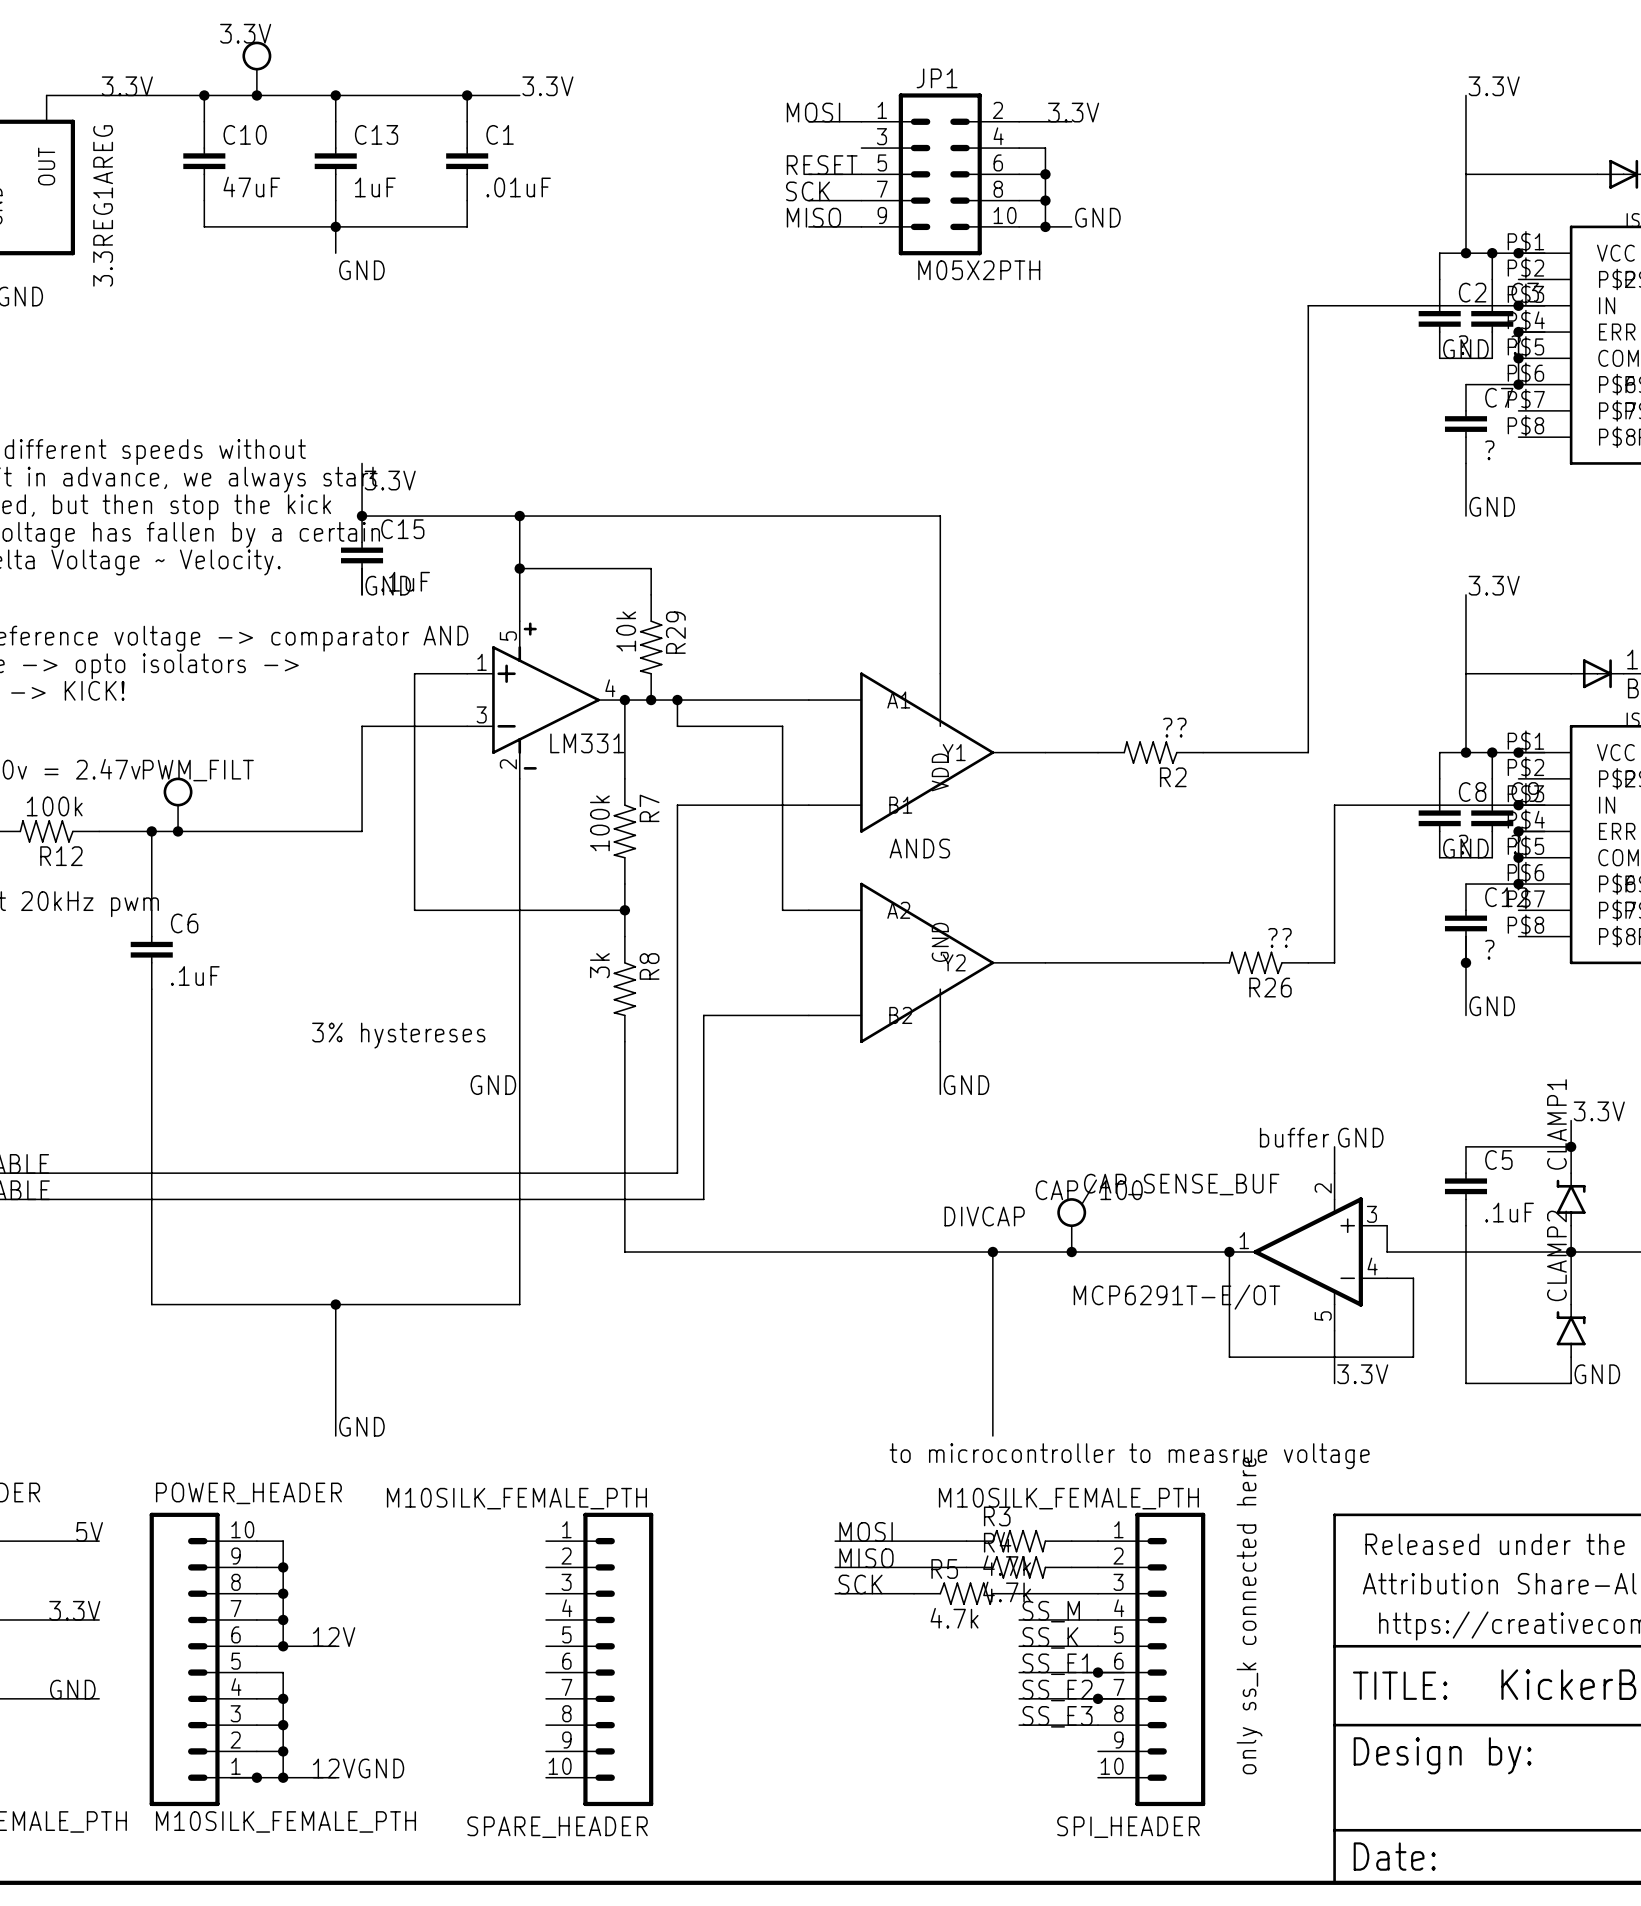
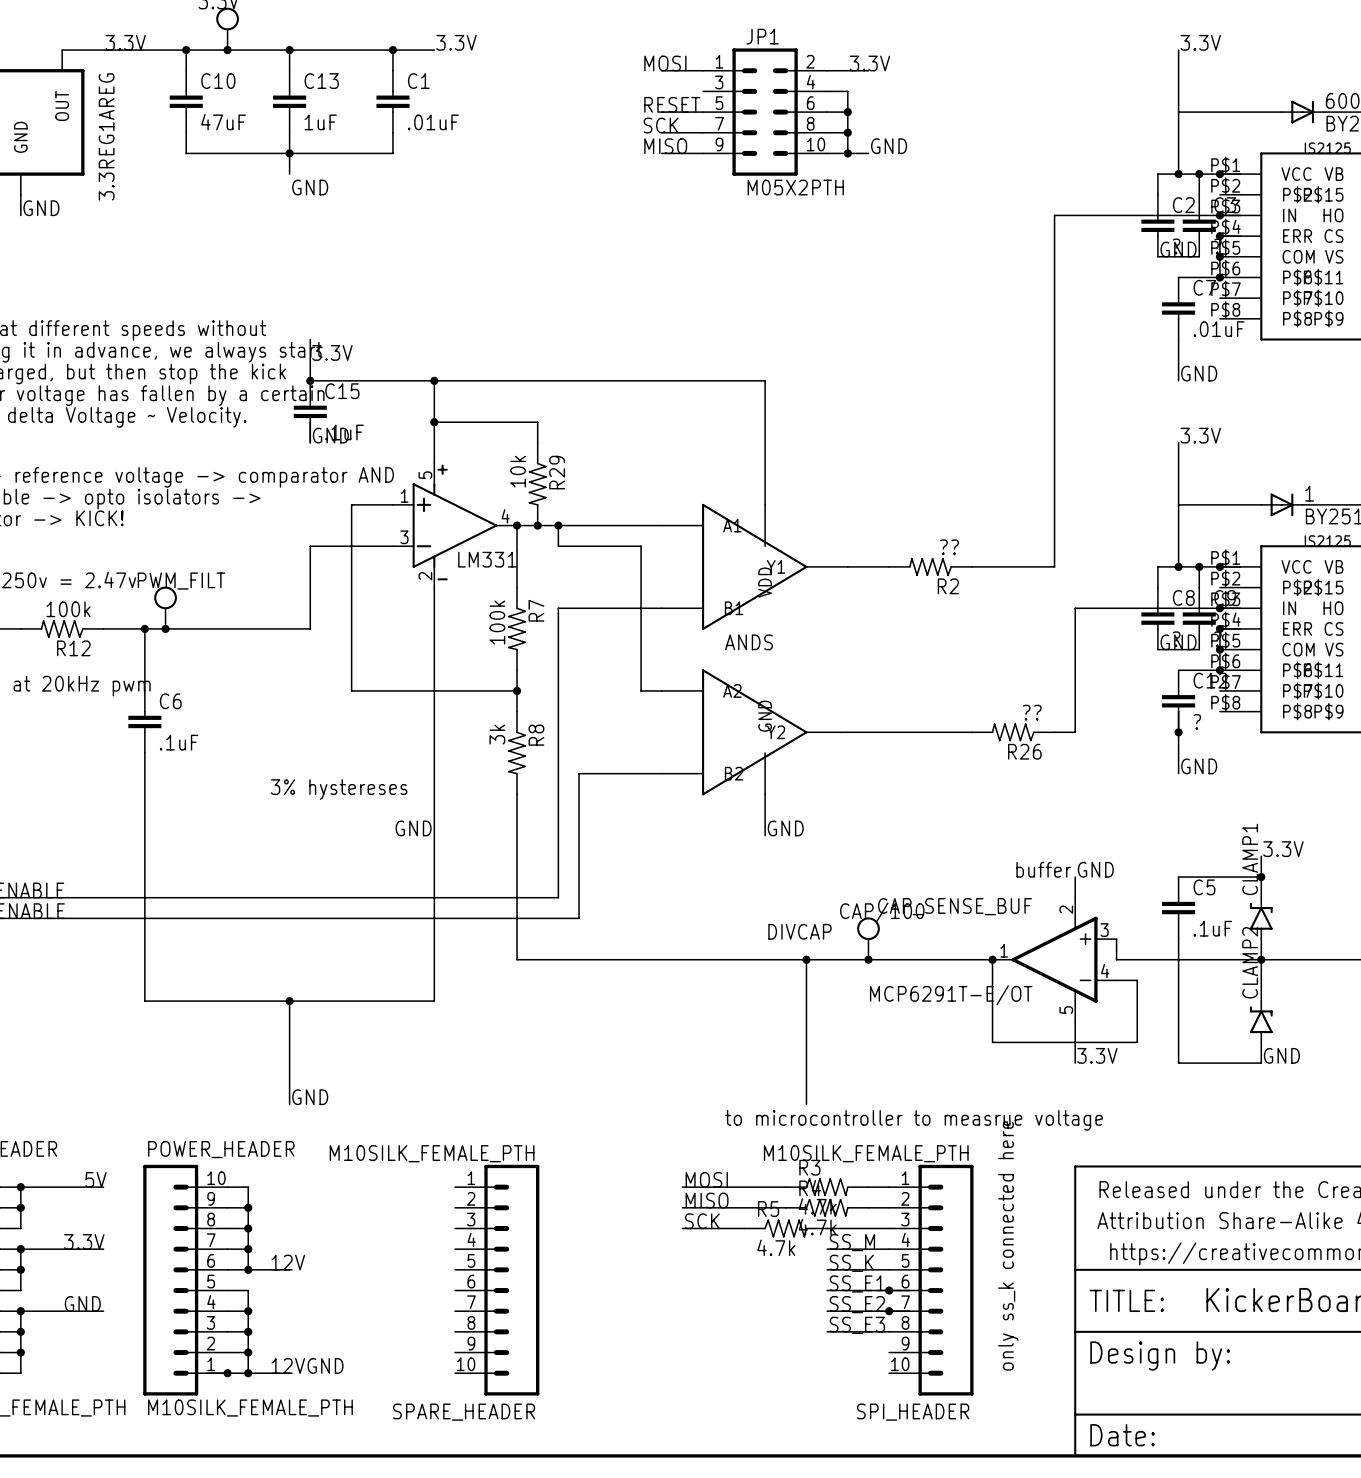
C7 value: ? (1489, 450) -> .01uF (1219, 329)

